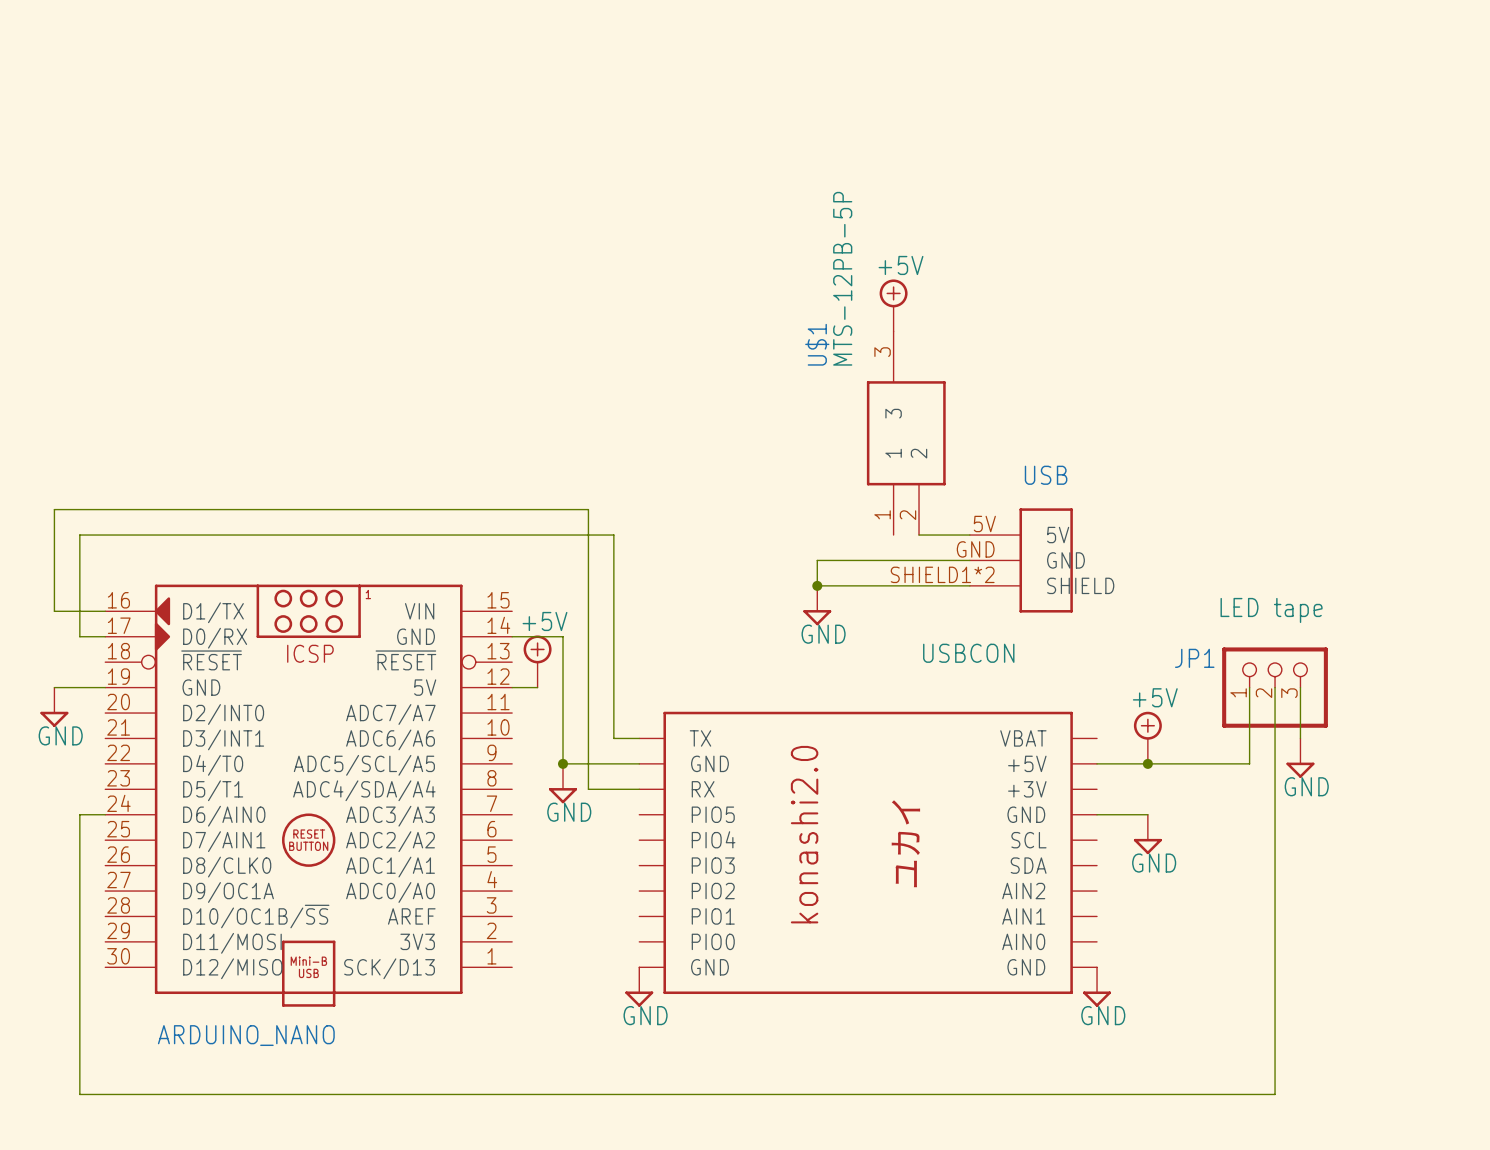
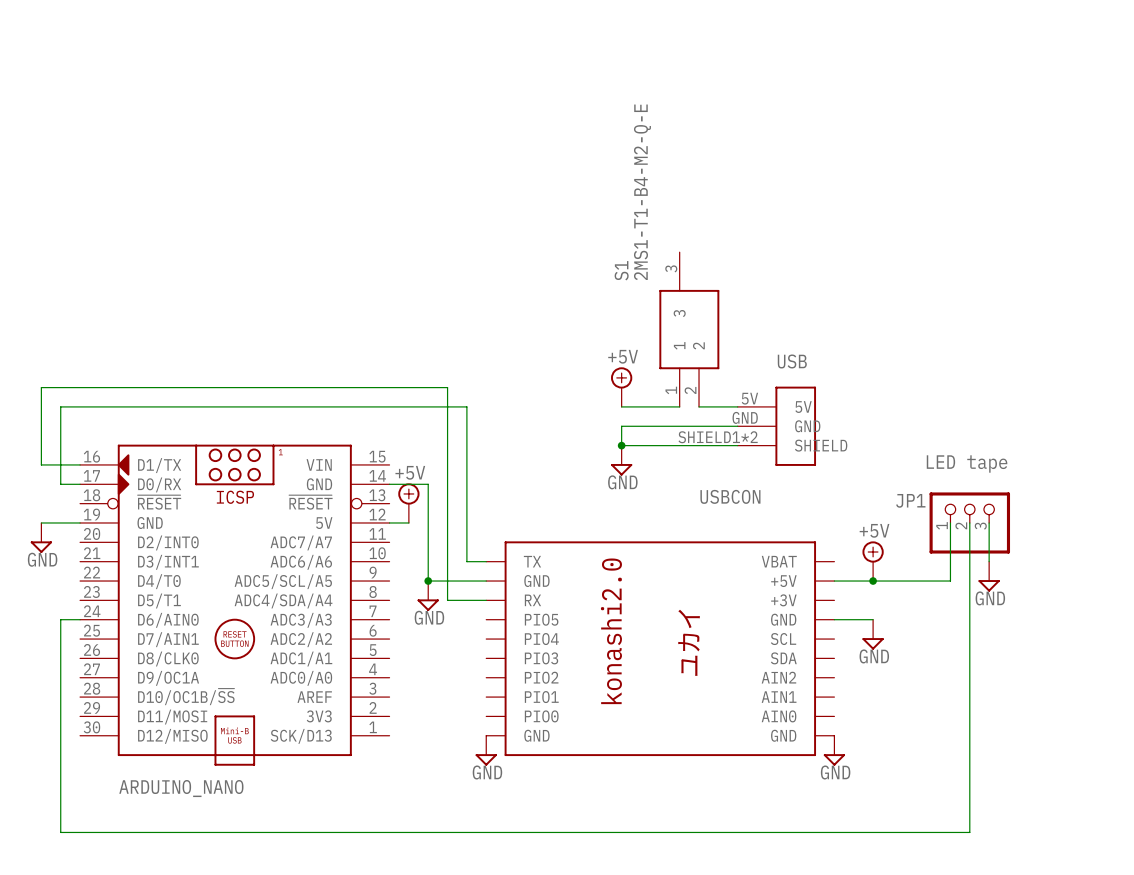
U$1 value: MTS-12PB-5P (842, 278) -> 2MS1-T1-B4-M2-Q-E (642, 192)
power symbol position: +5V (893, 305) -> +5V (621, 387)
U$1 name: U$1 (817, 344) -> S1 (621, 270)
wire: none -> (621, 406) (679, 406)

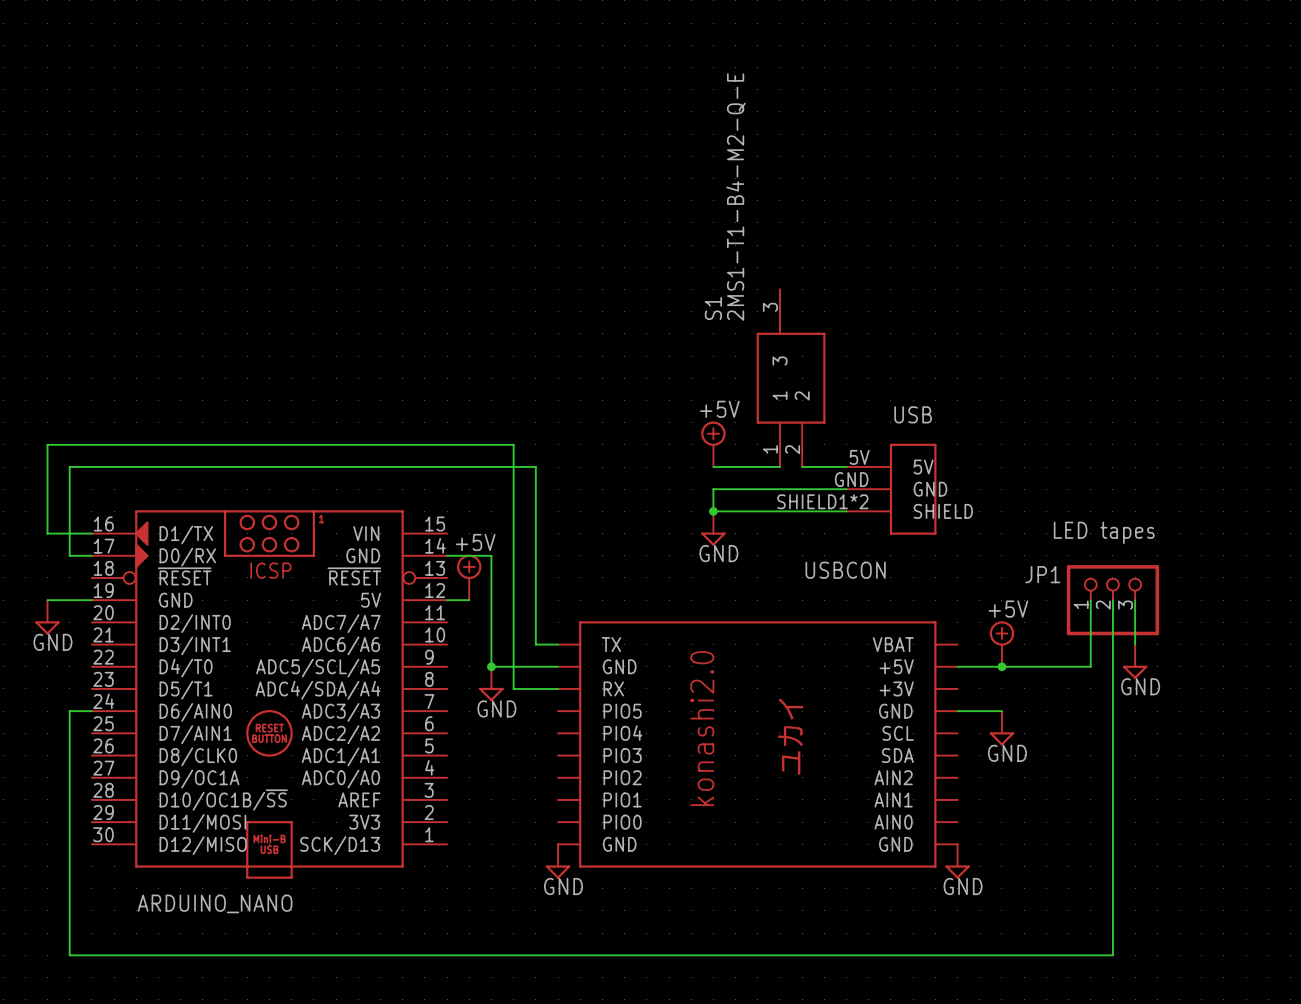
JP1 value: LED tape (967, 464) -> LED tapes (1104, 532)

